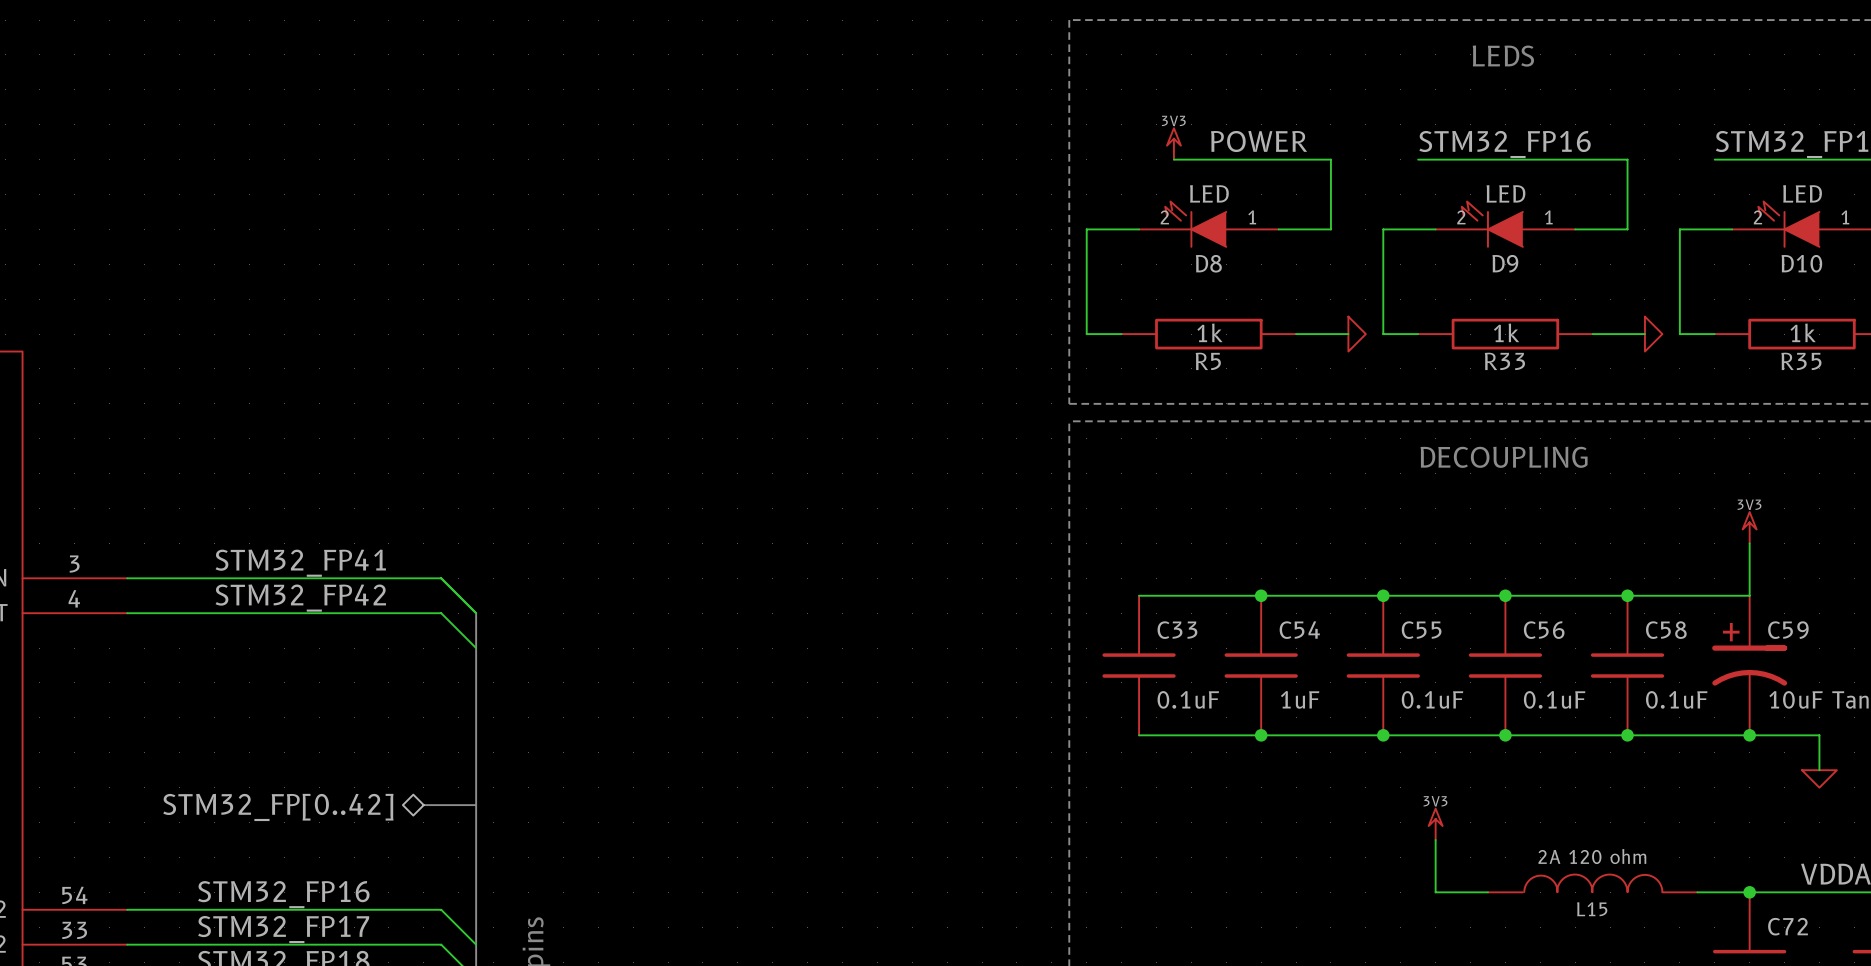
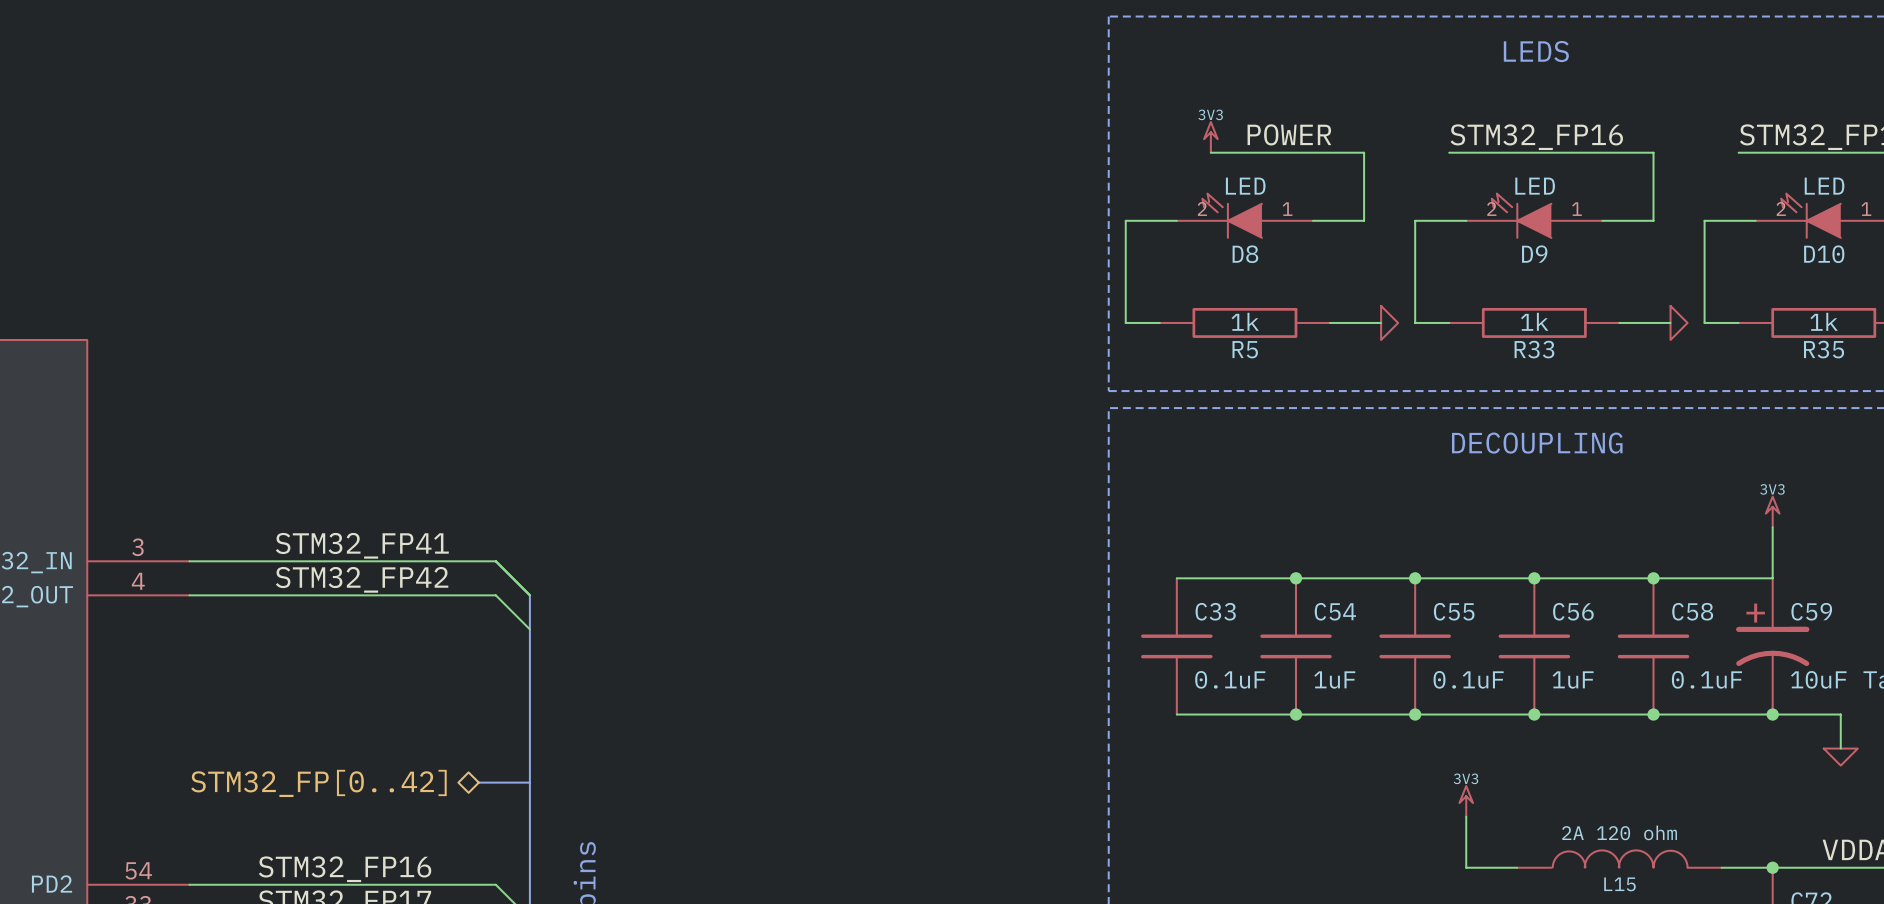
C56 value: 0.1uF (1554, 699) -> 1uF (1573, 679)

